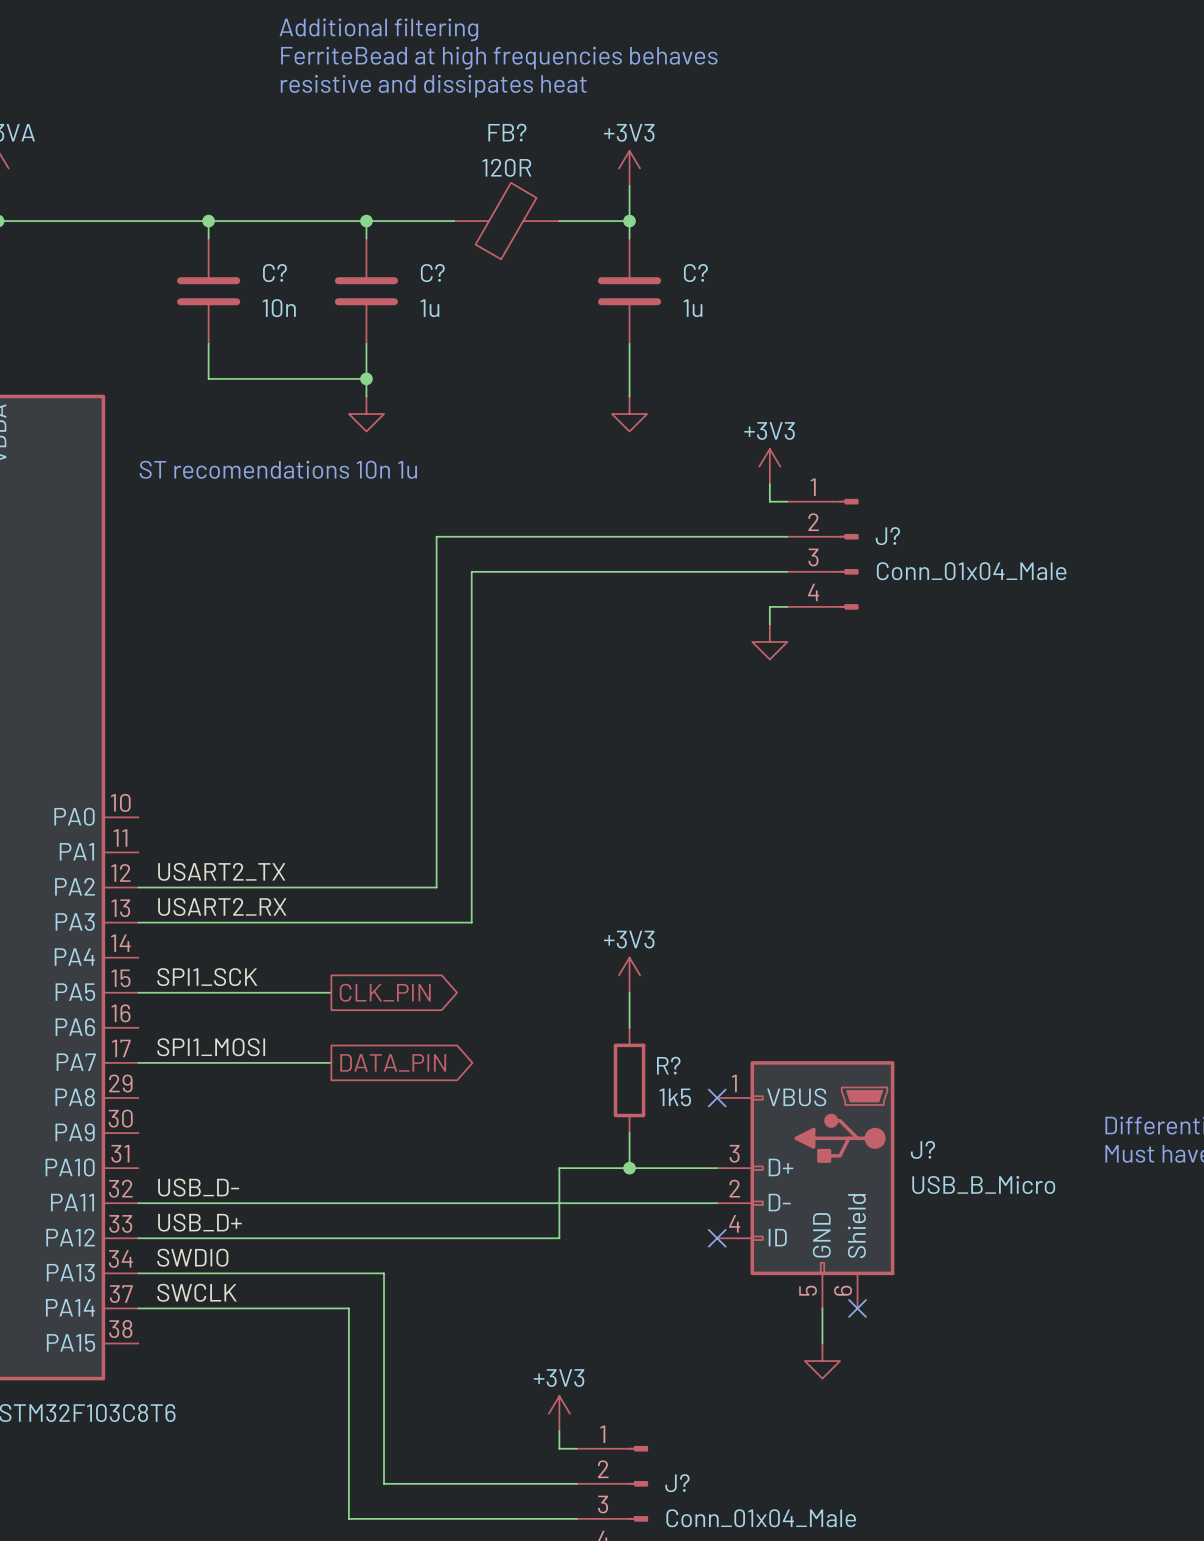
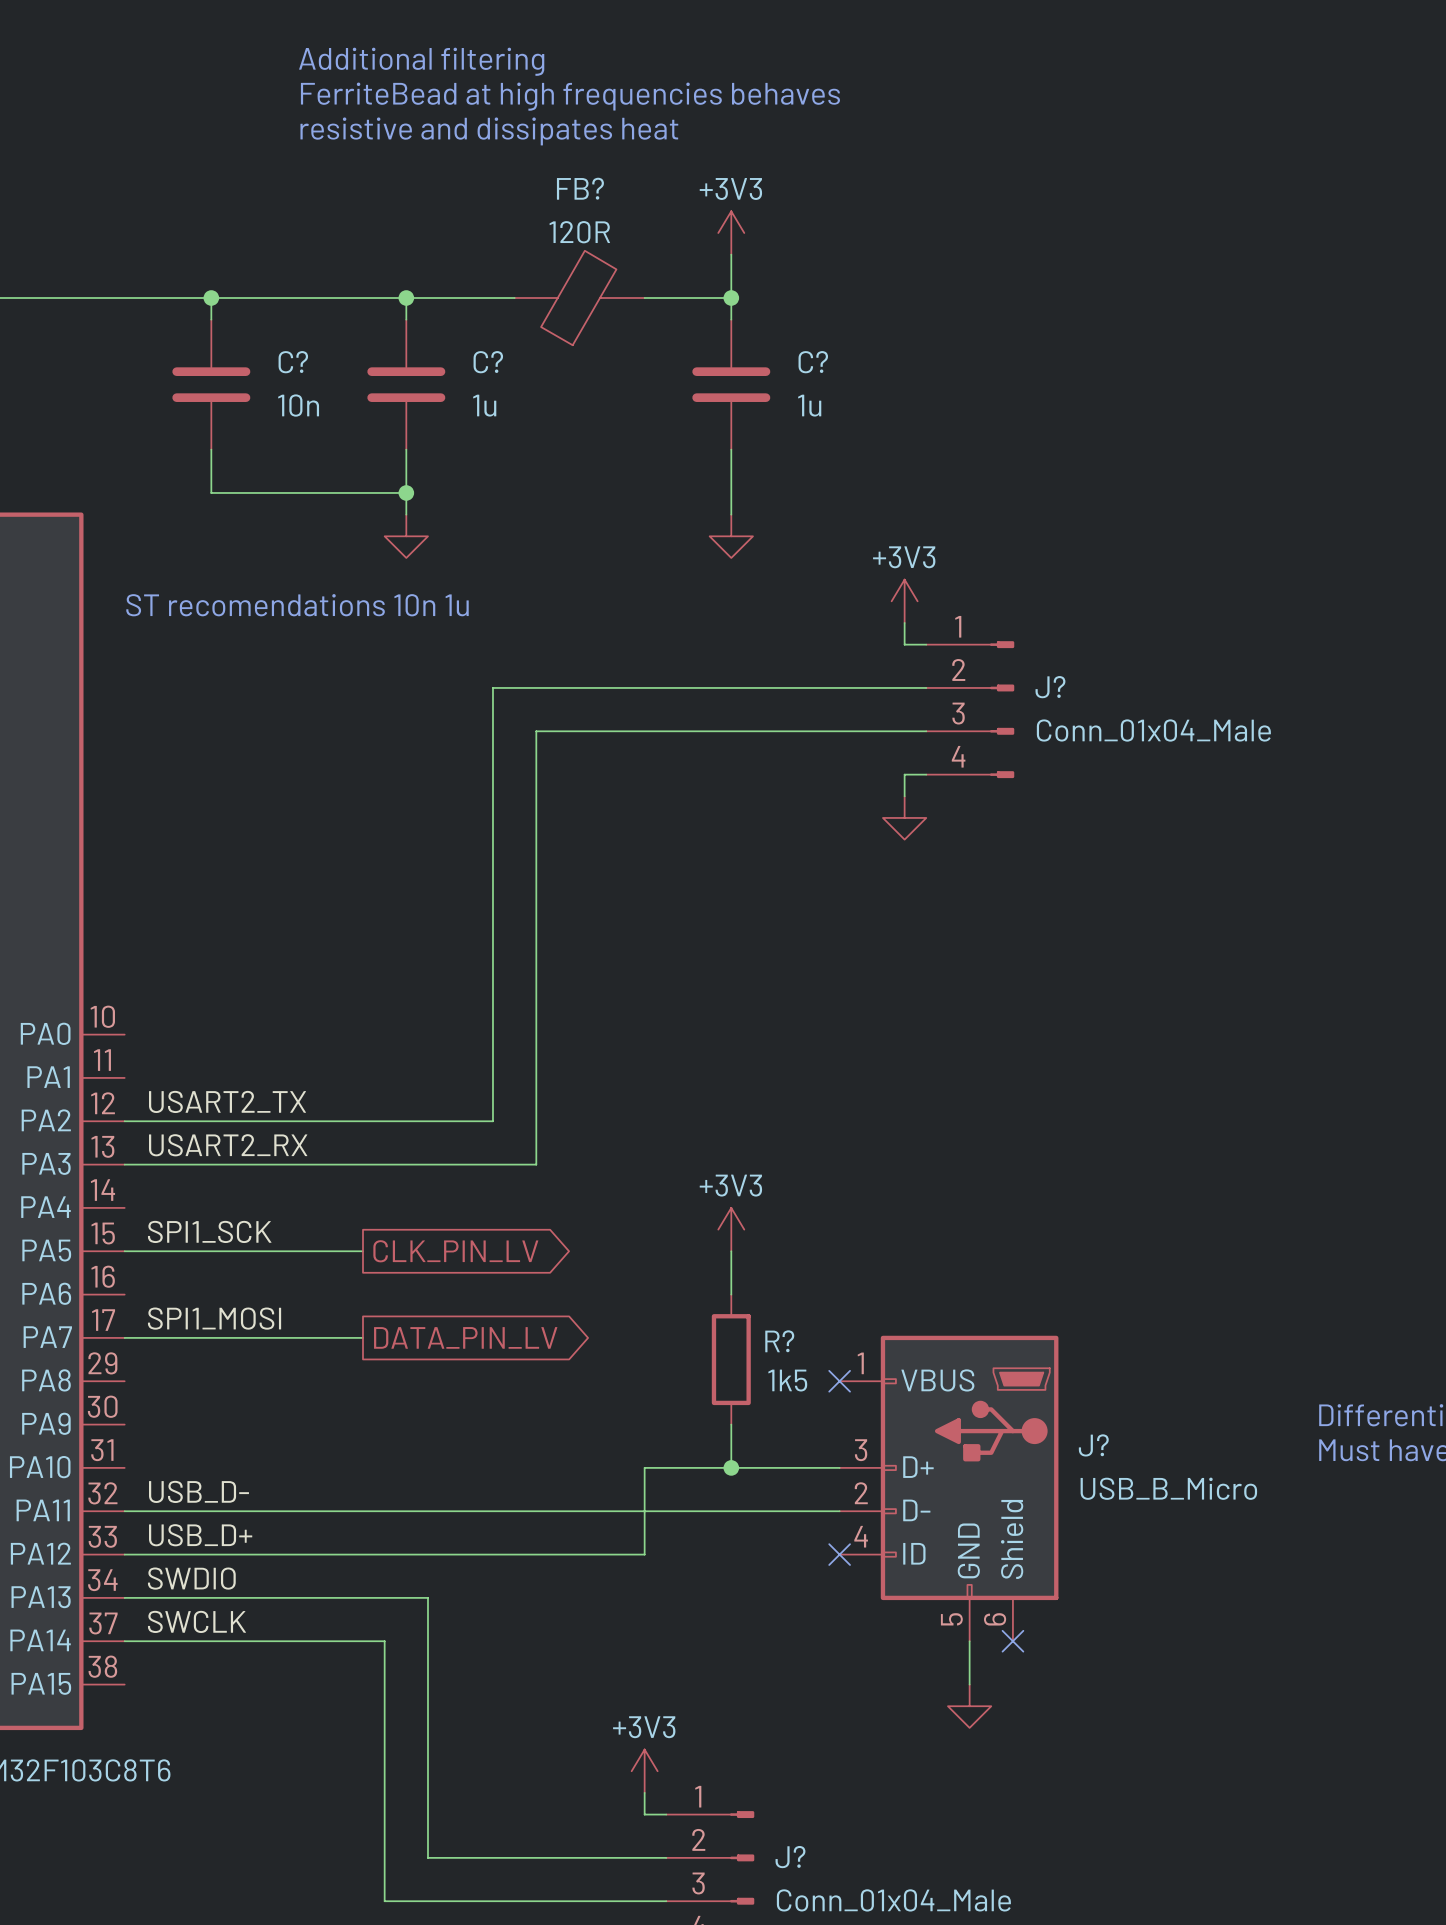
global label: CLK_PIN (385, 992) -> CLK_PIN_LV (455, 1251)
global label: DATA_PIN (393, 1062) -> DATA_PIN_LV (465, 1337)

